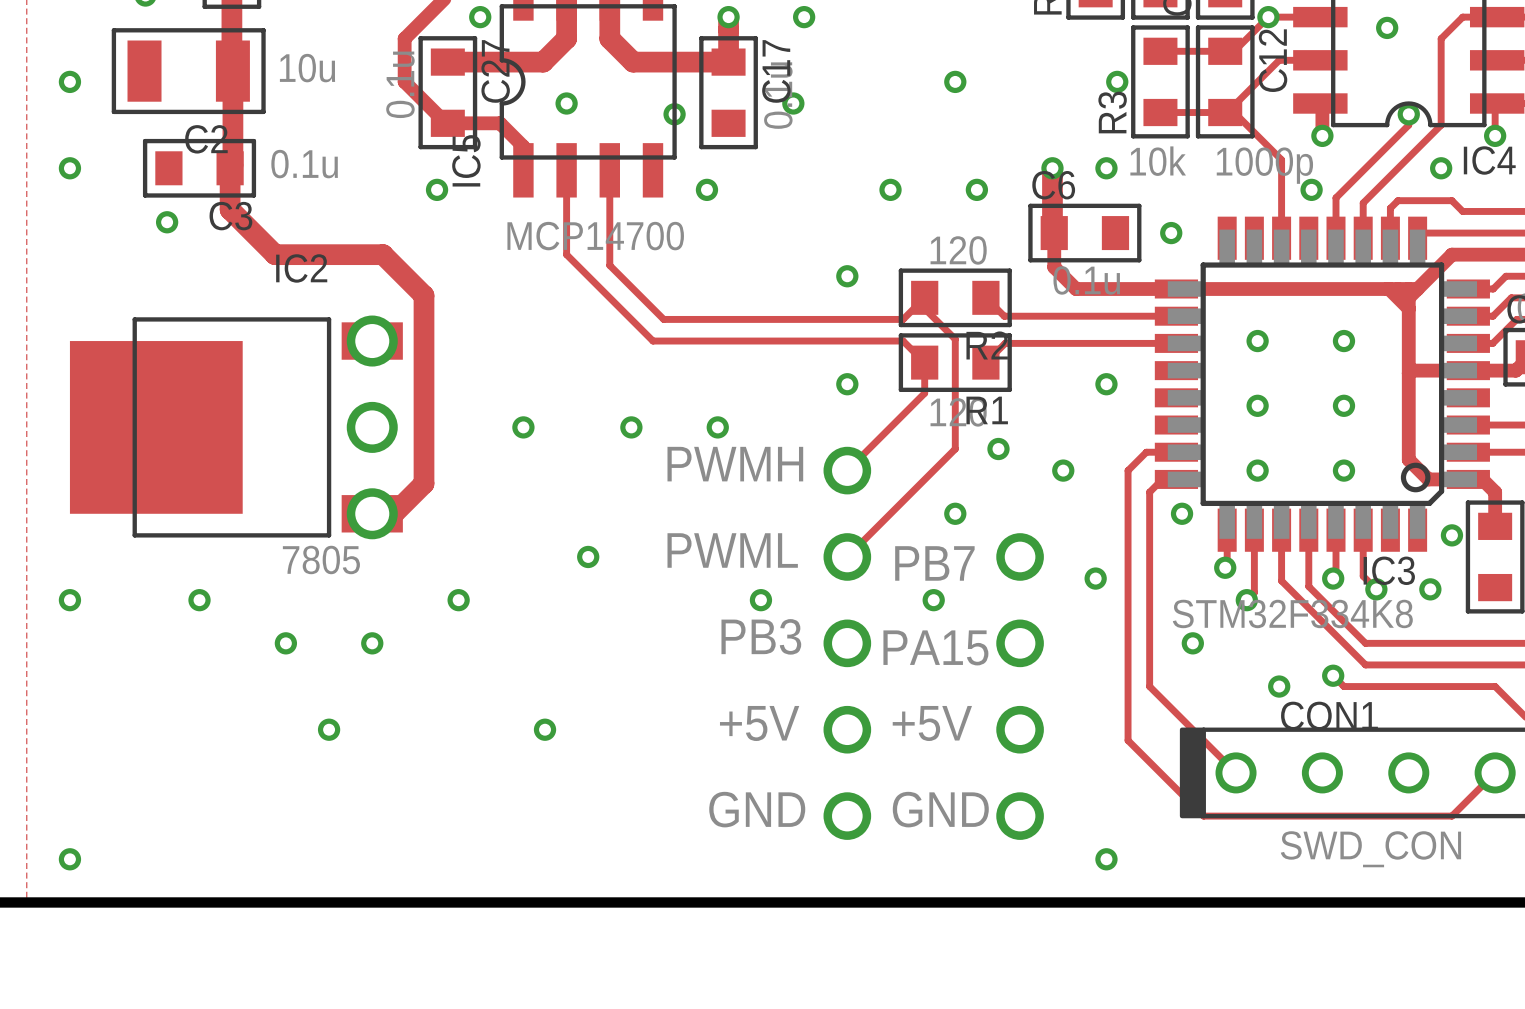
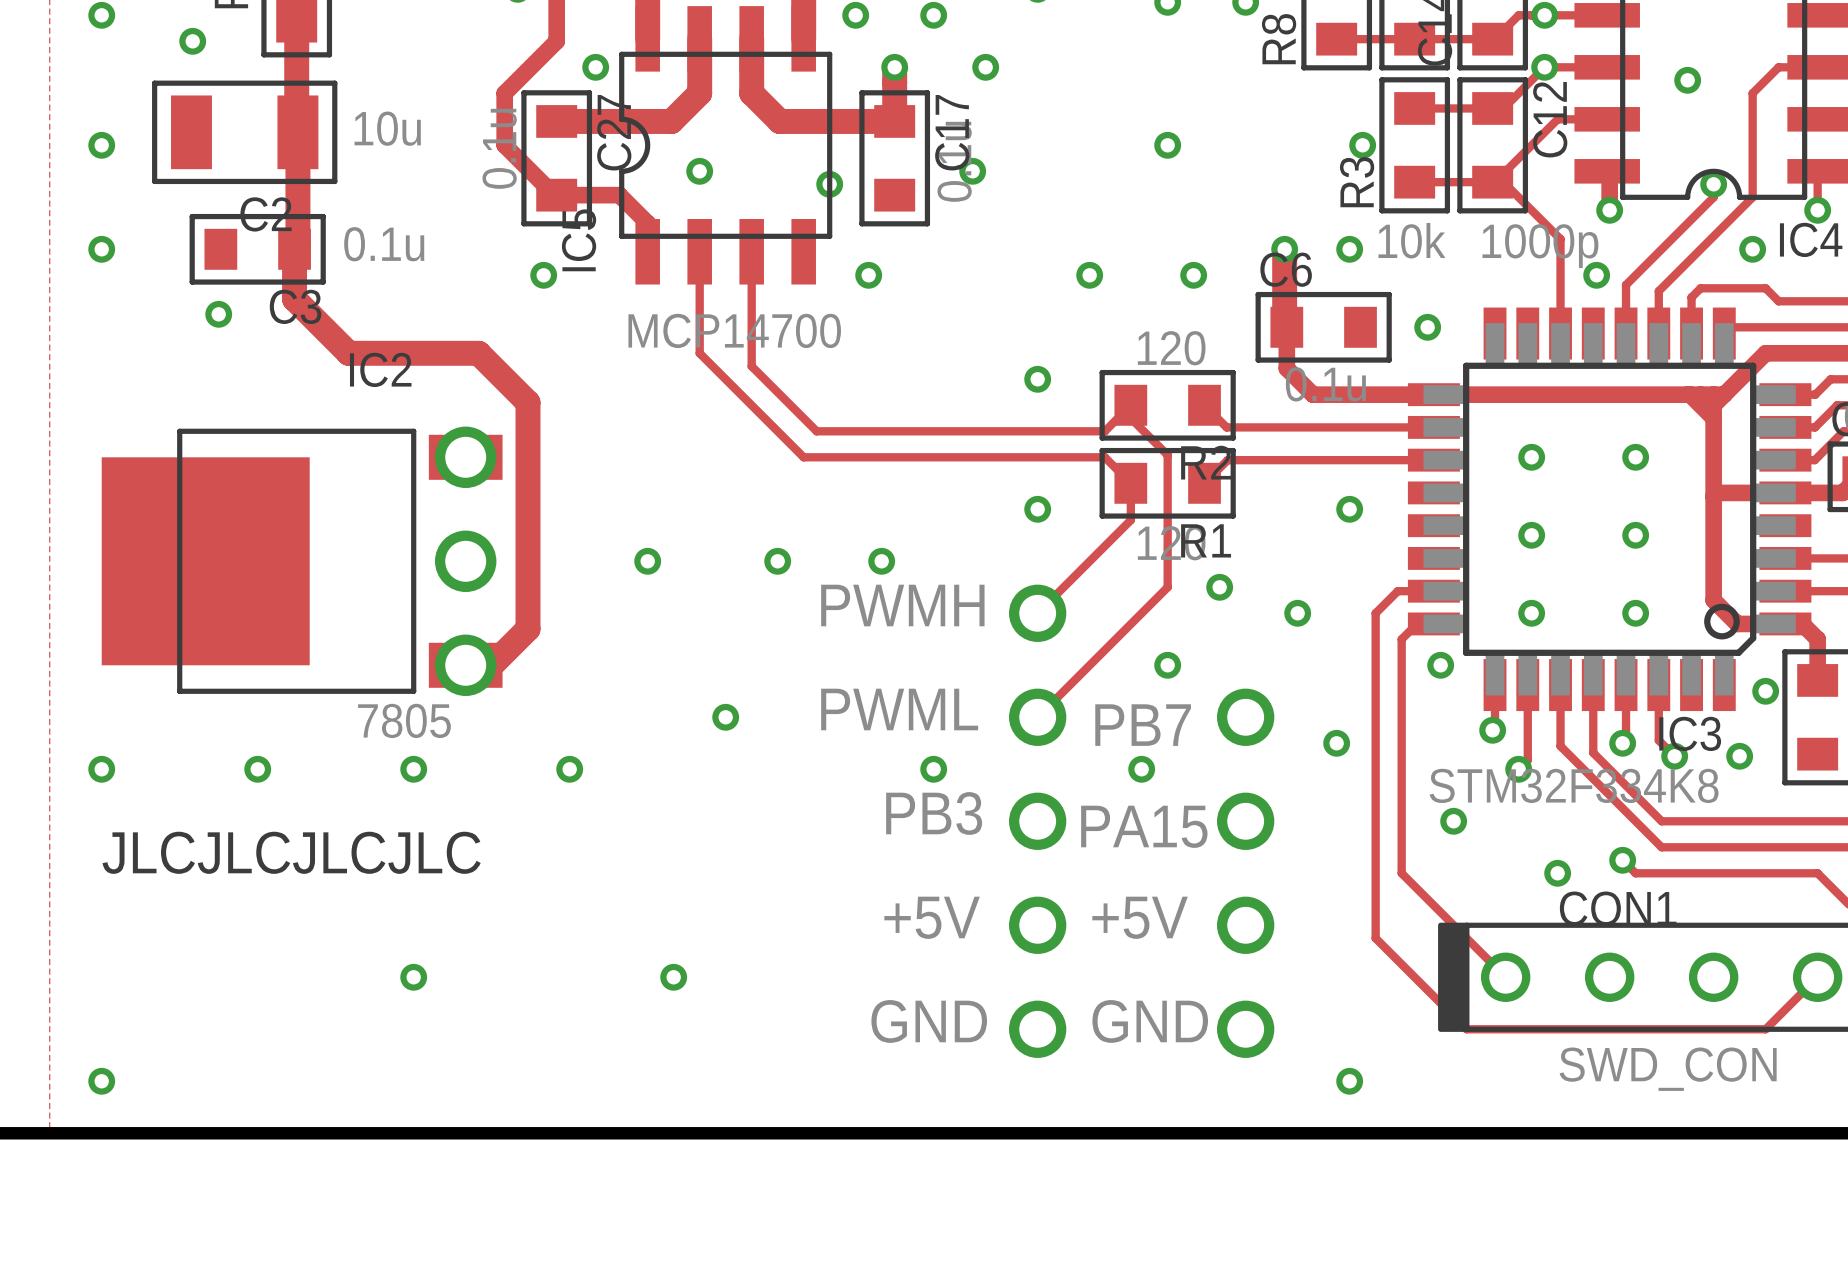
via: none -> (413, 769)
via: (285, 643) -> none
via: (372, 643) -> none
text: none -> JLCJLCJLCJLC (291, 852)
via position: (329, 729) -> (413, 977)
via position: (545, 729) -> (673, 977)

